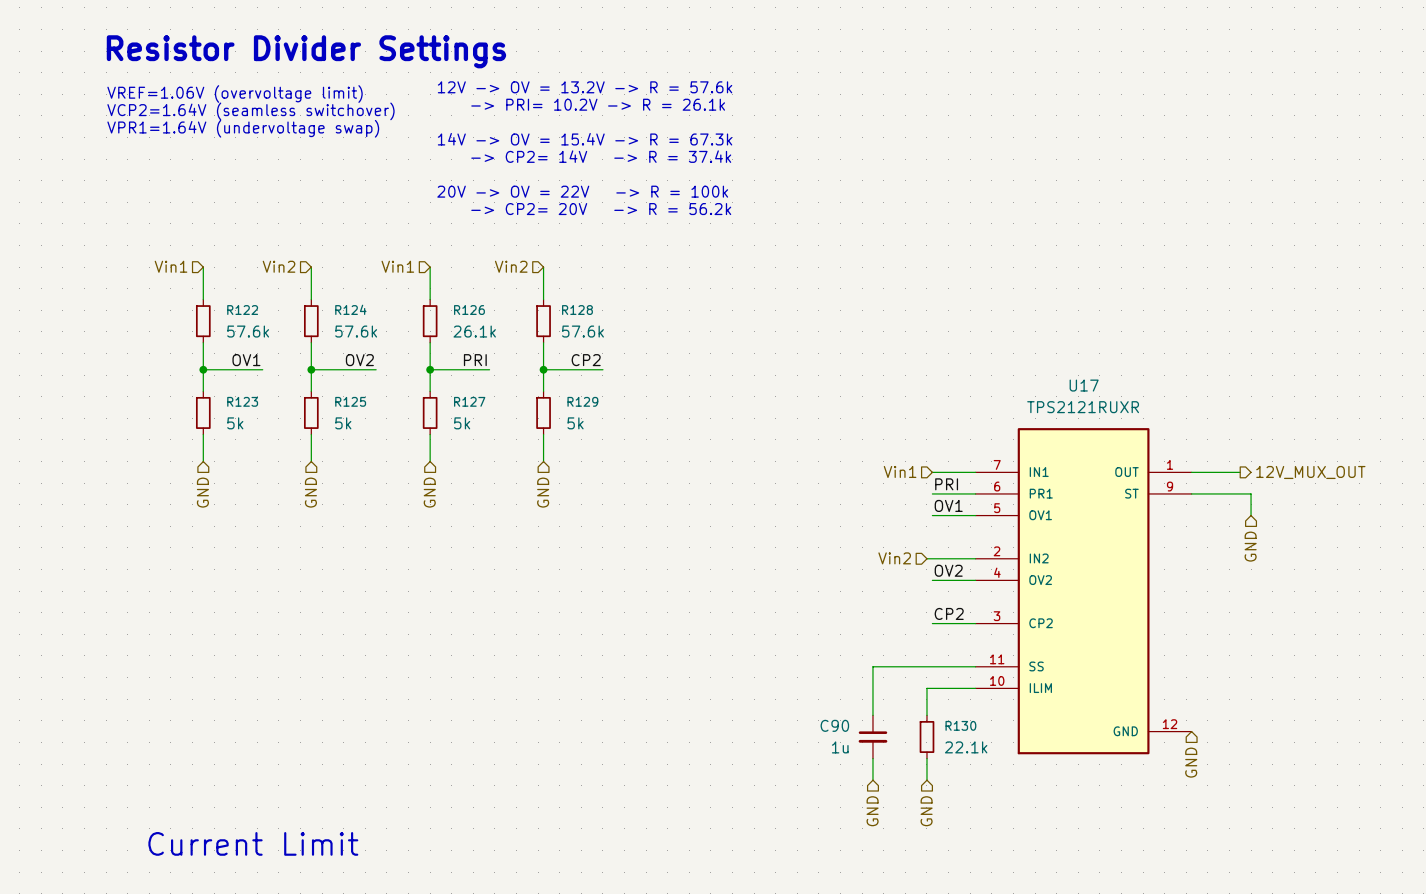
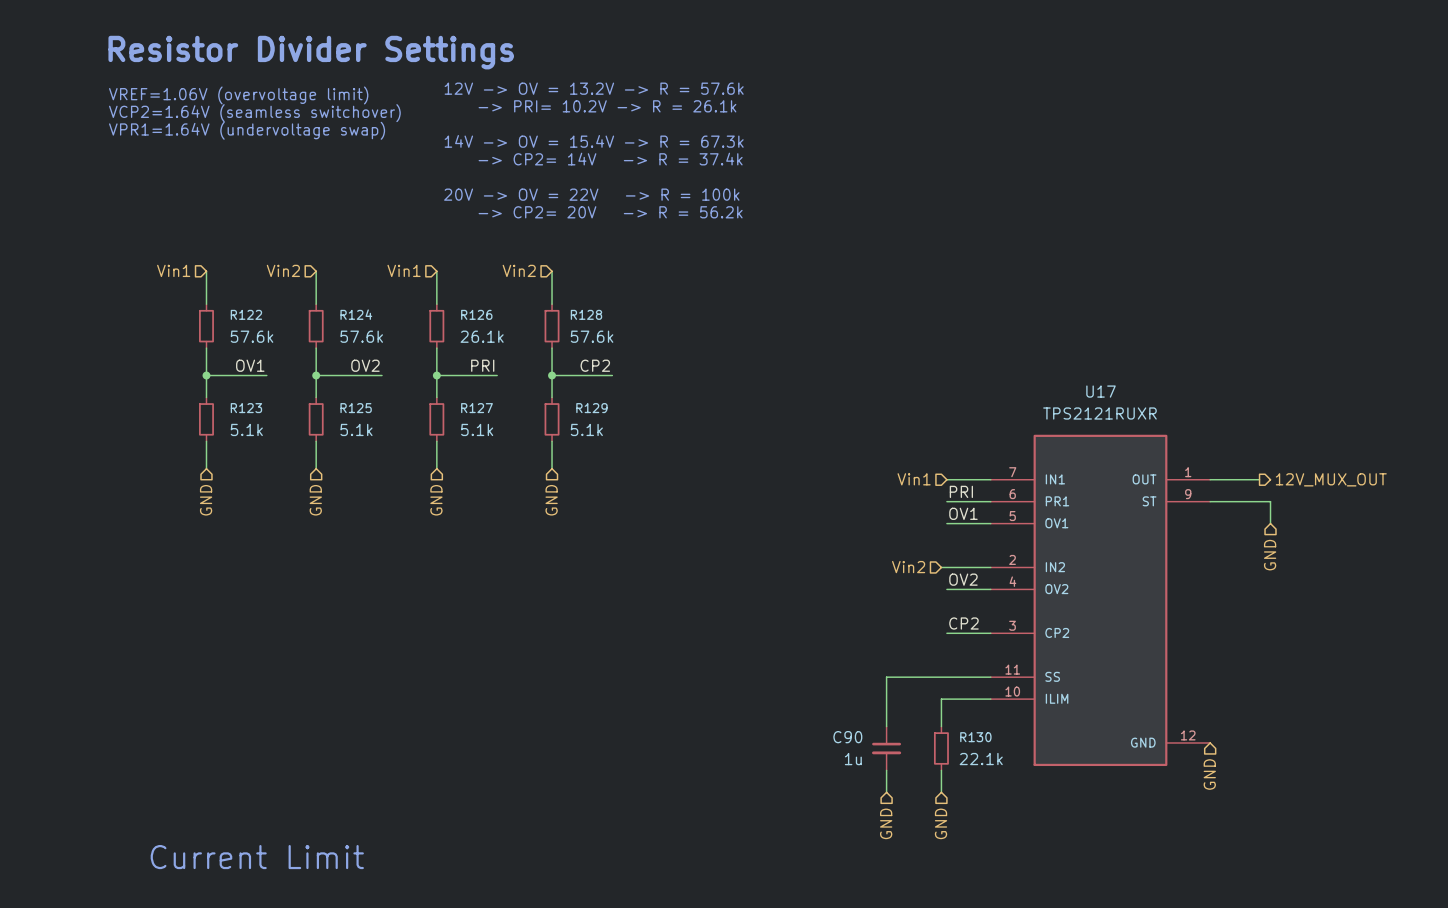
R123 value: 5k (235, 423) -> 5.1k (246, 429)
R125 value: 5k (343, 423) -> 5.1k (356, 429)
R127 value: 5k (462, 423) -> 5.1k (477, 429)
R129 value: 5k (575, 423) -> 5.1k (586, 429)

